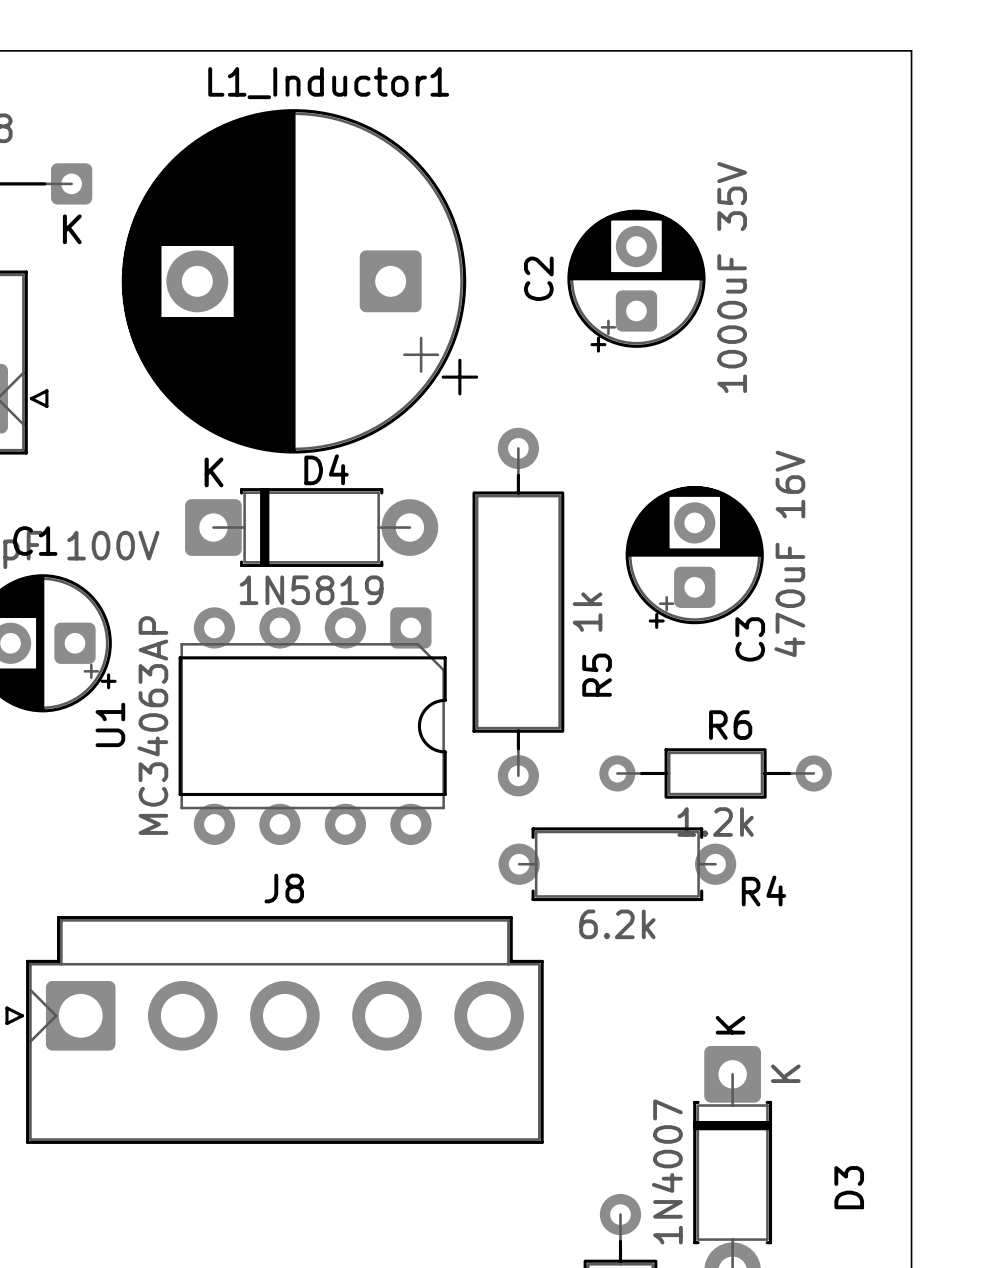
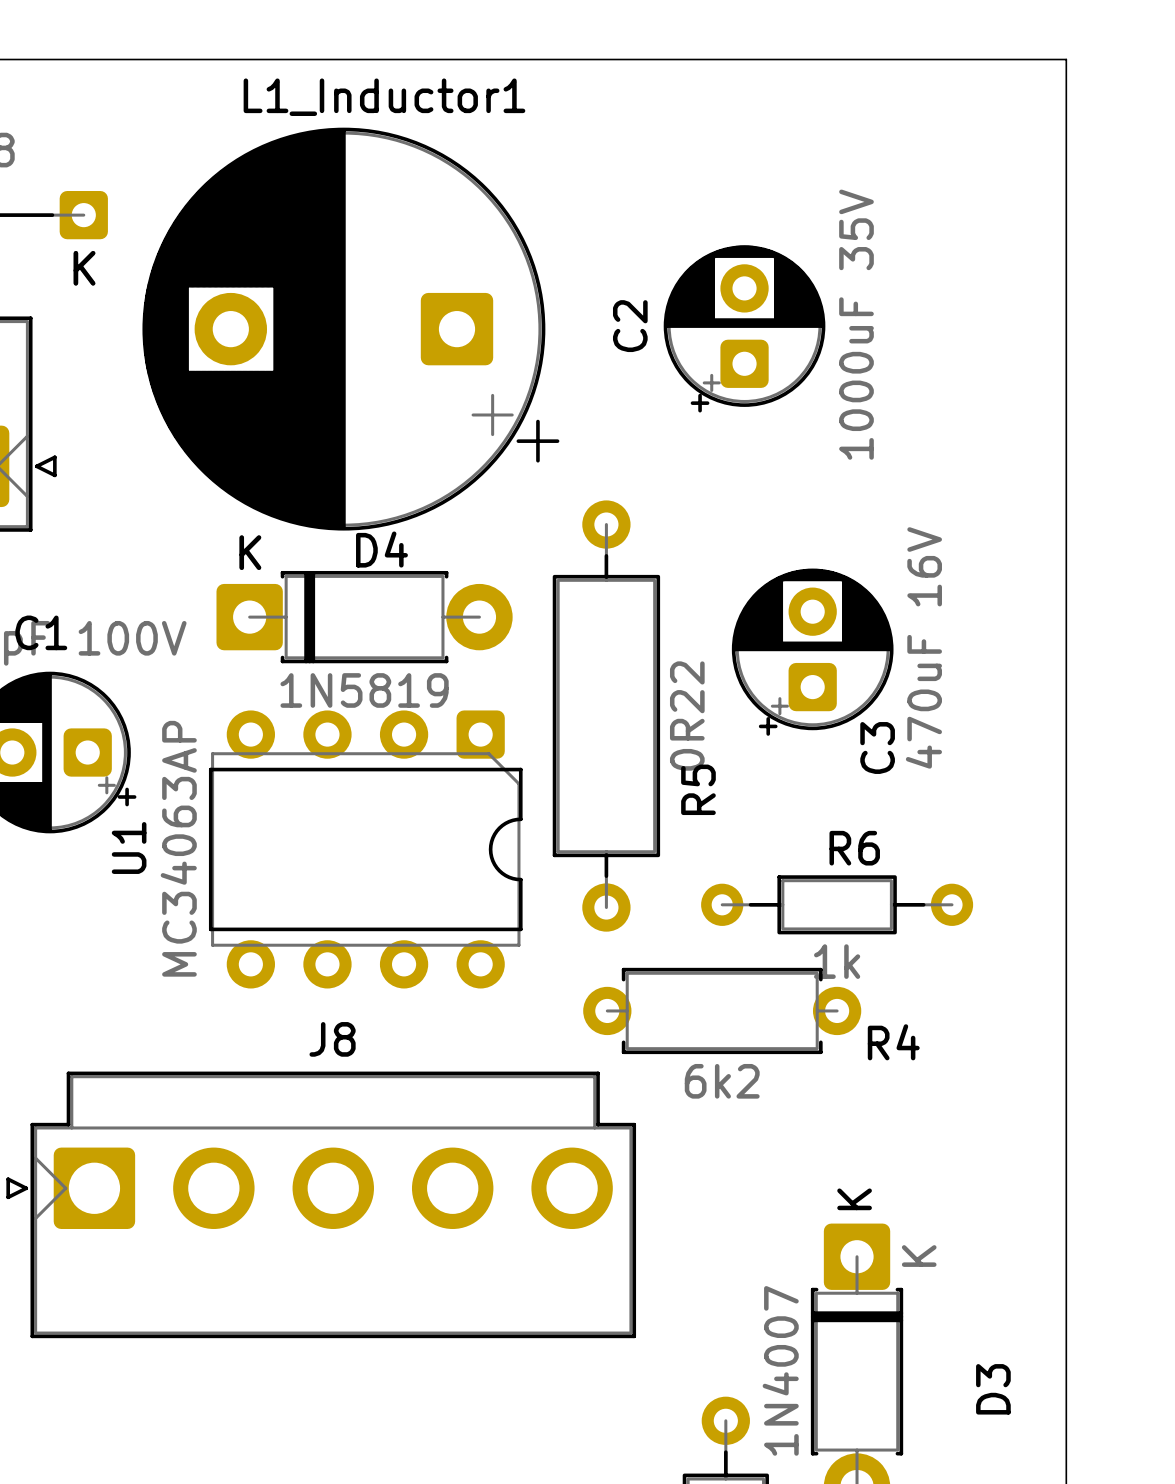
R5 value: 1k (587, 612) -> 0R22 (687, 716)
R6 value: 1.2k (715, 822) -> 1k (837, 961)
R4 value: 6.2k (617, 924) -> 6k2 (722, 1081)

